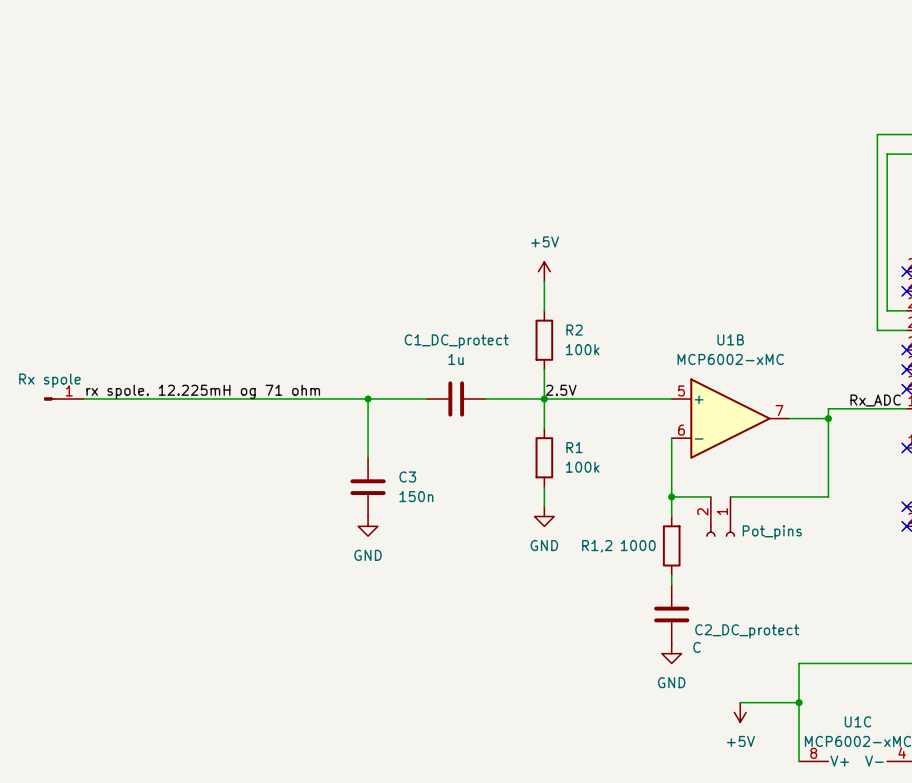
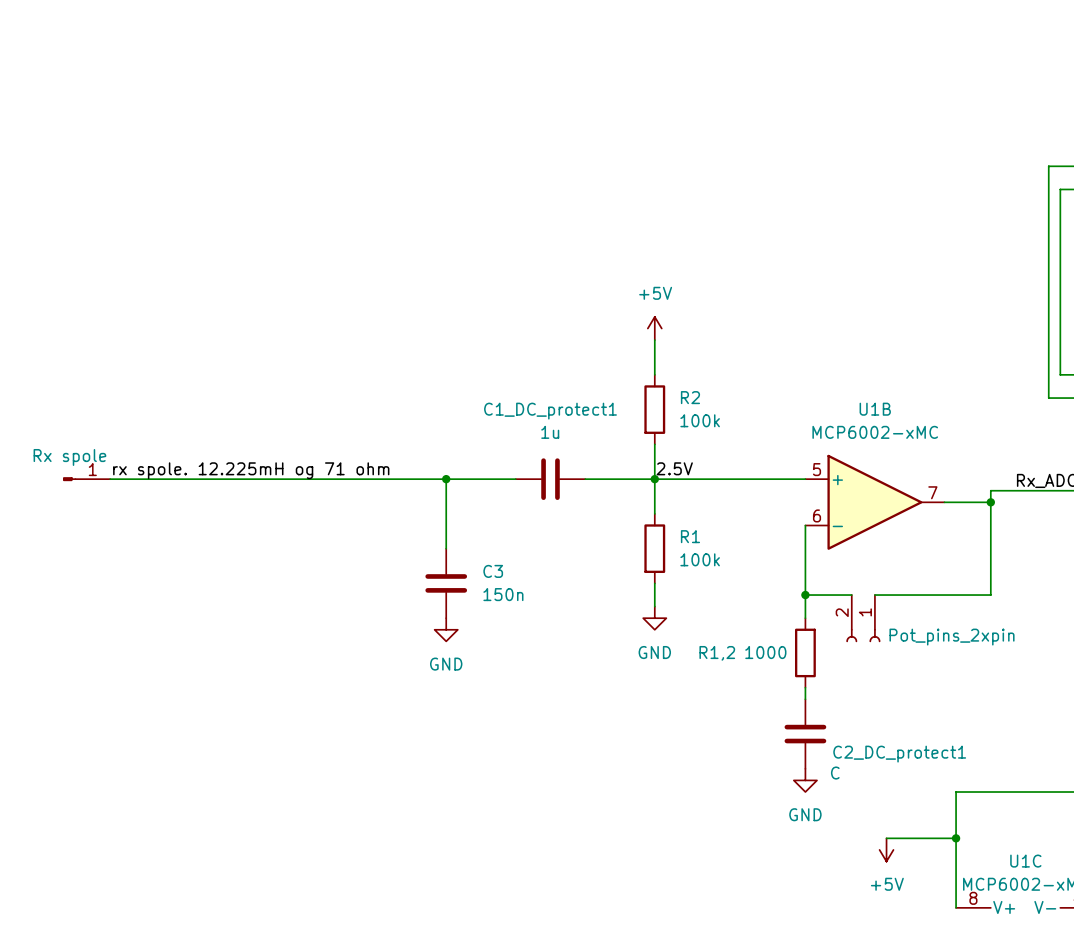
C1_DC_protect name: C1_DC_protect (456, 341) -> C1_DC_protect1 (550, 411)
part value: Pot_pins (772, 532) -> Pot_pins_2xpin (952, 637)
C2_DC_protect name: C2_DC_protect (747, 631) -> C2_DC_protect1 (899, 754)

